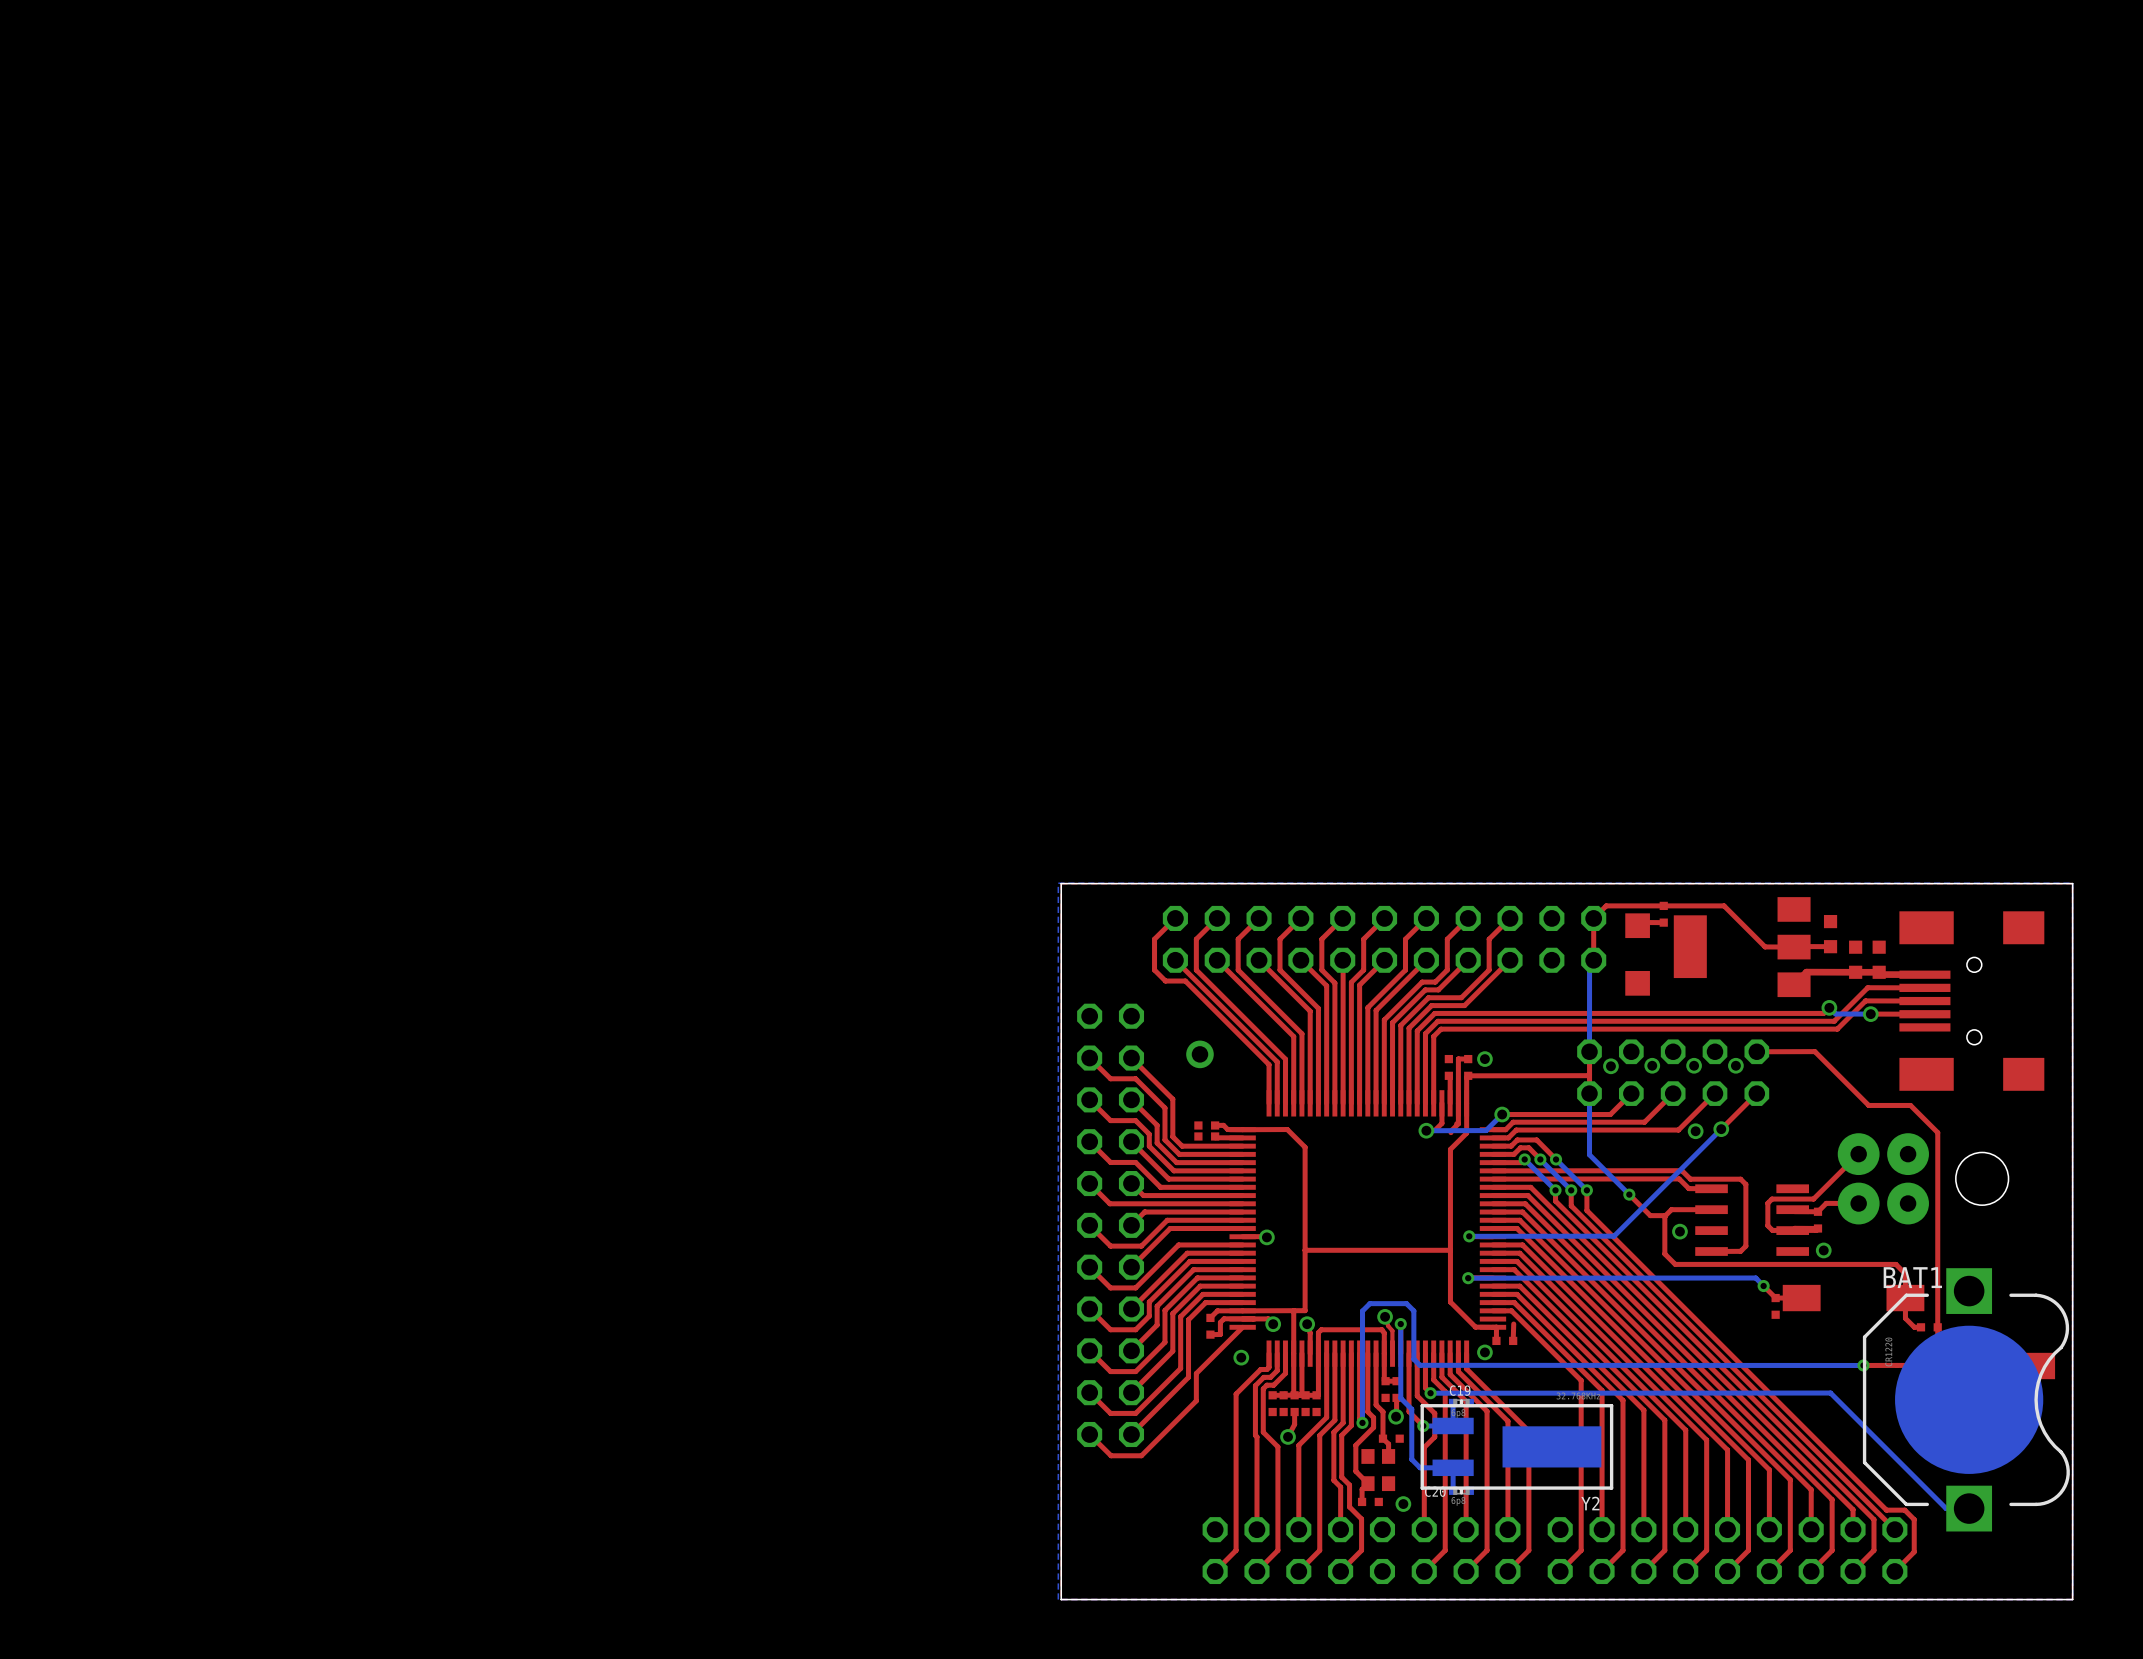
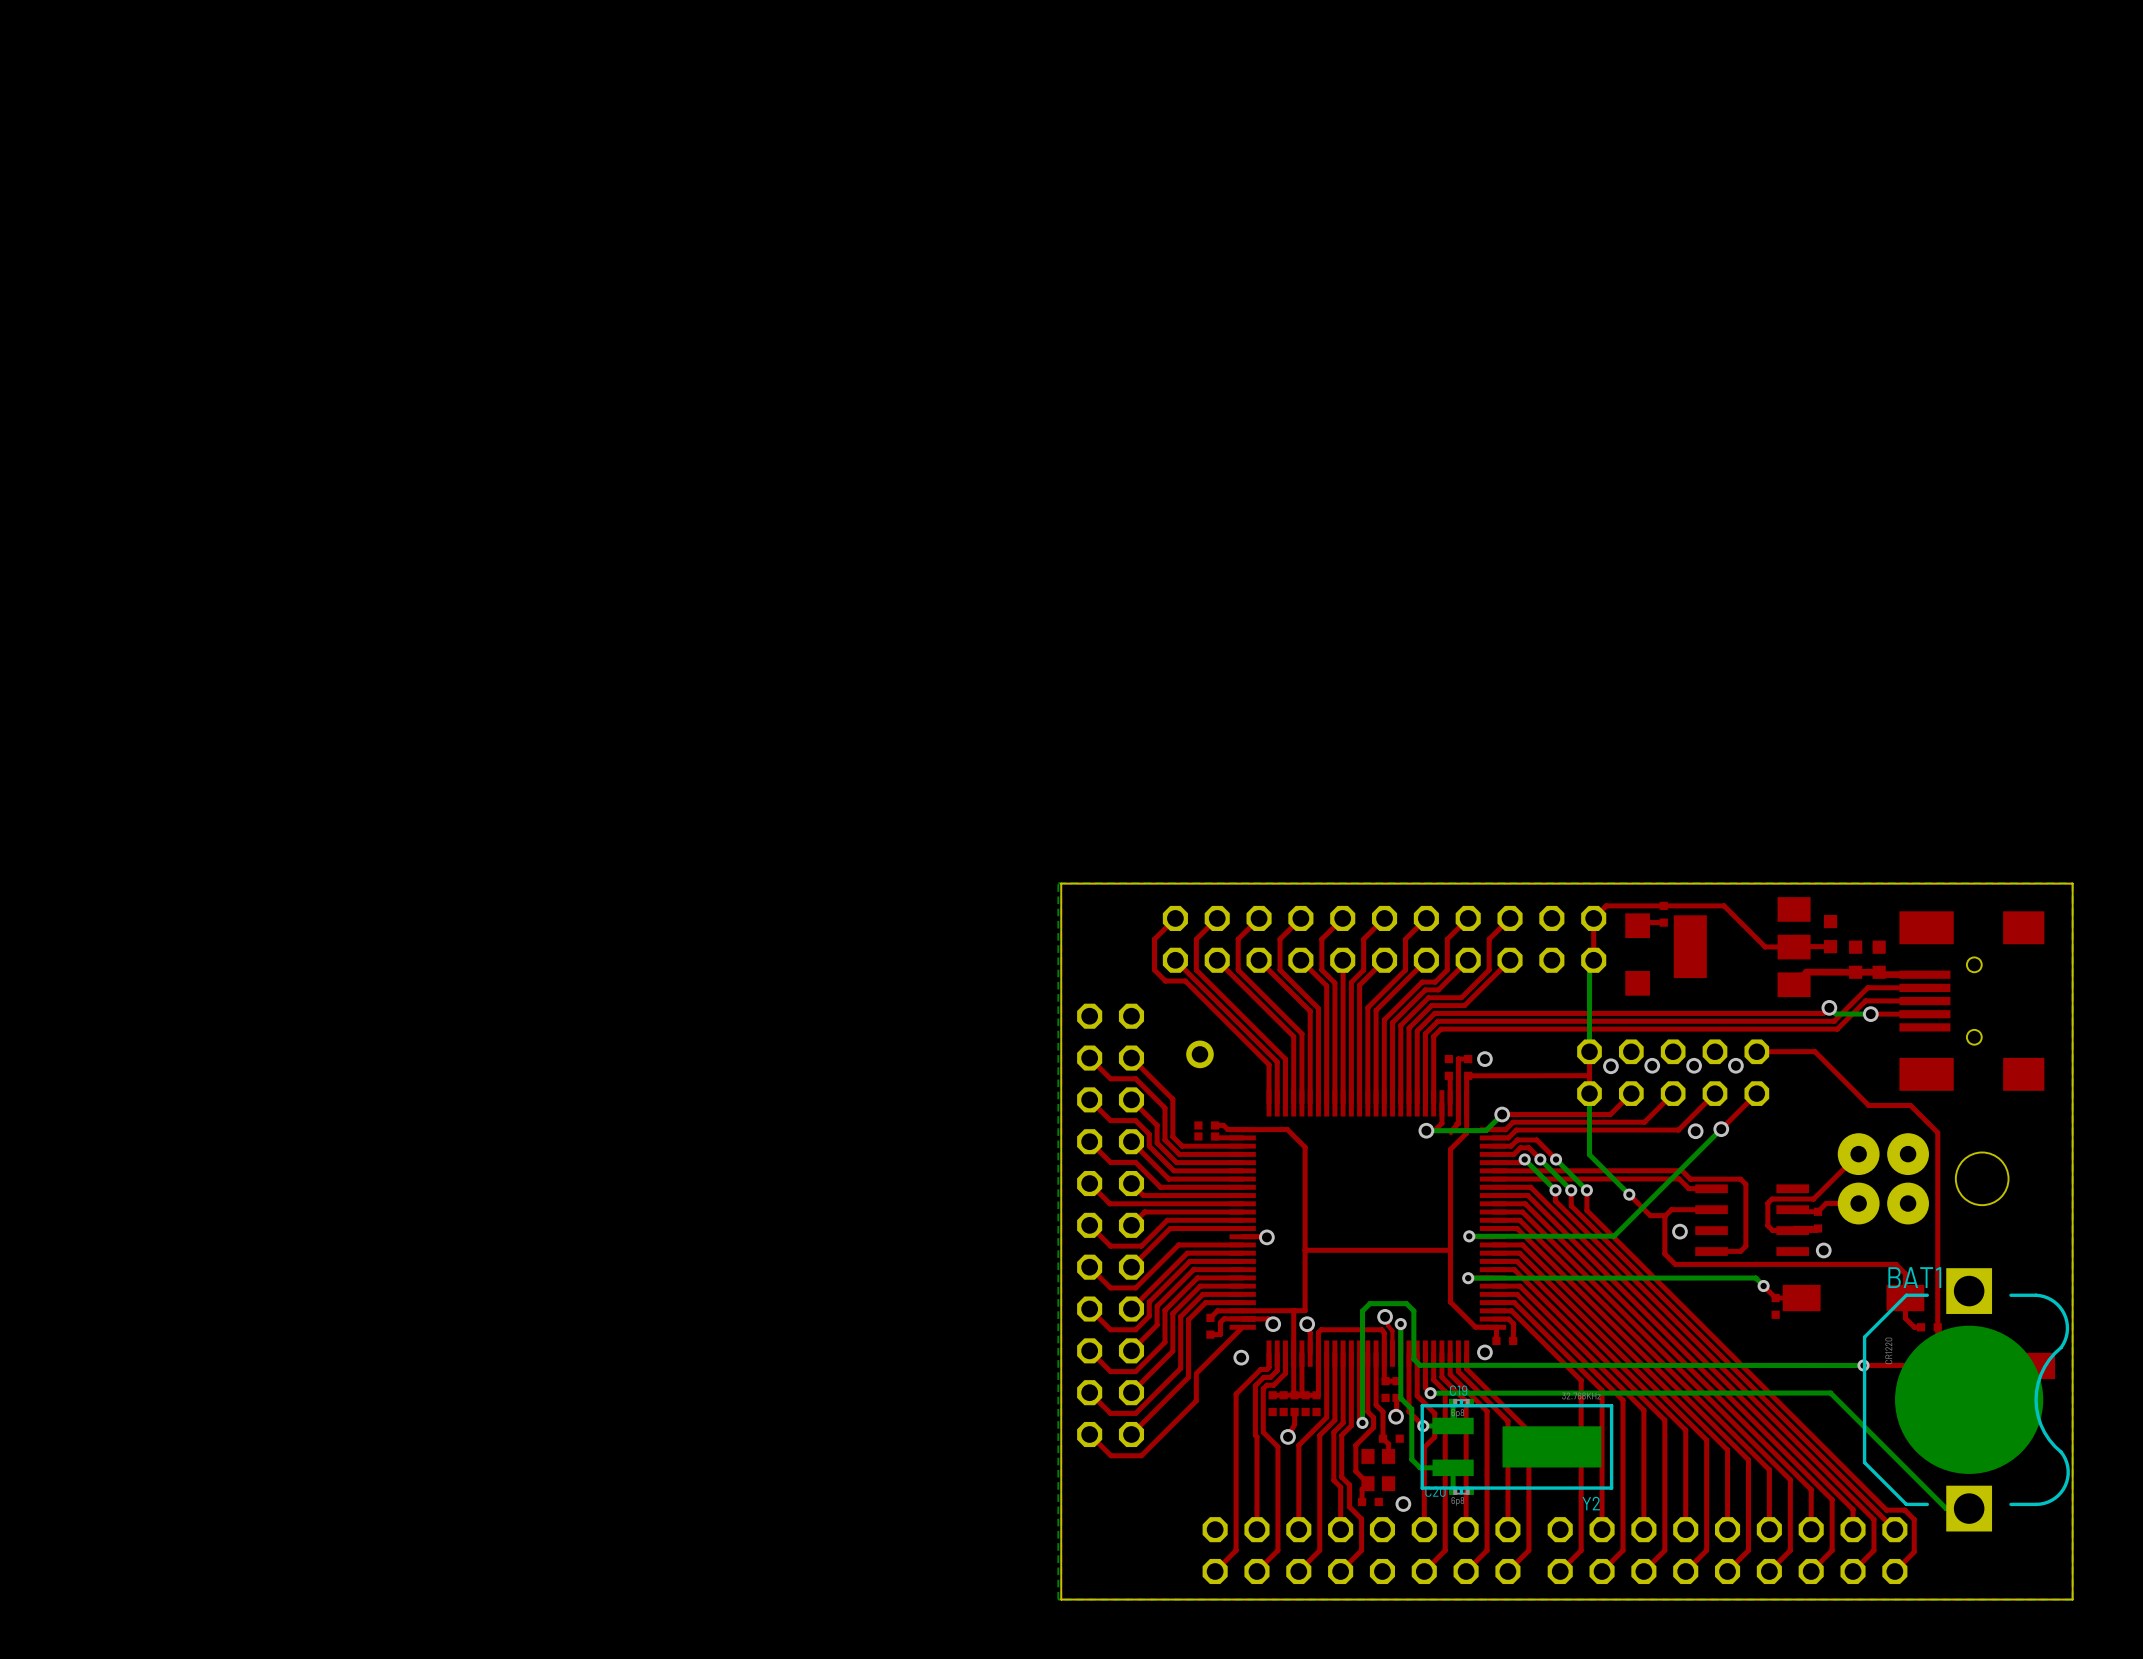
top track: none -> (1492, 1319) (1508, 1319) (1513, 1324)

